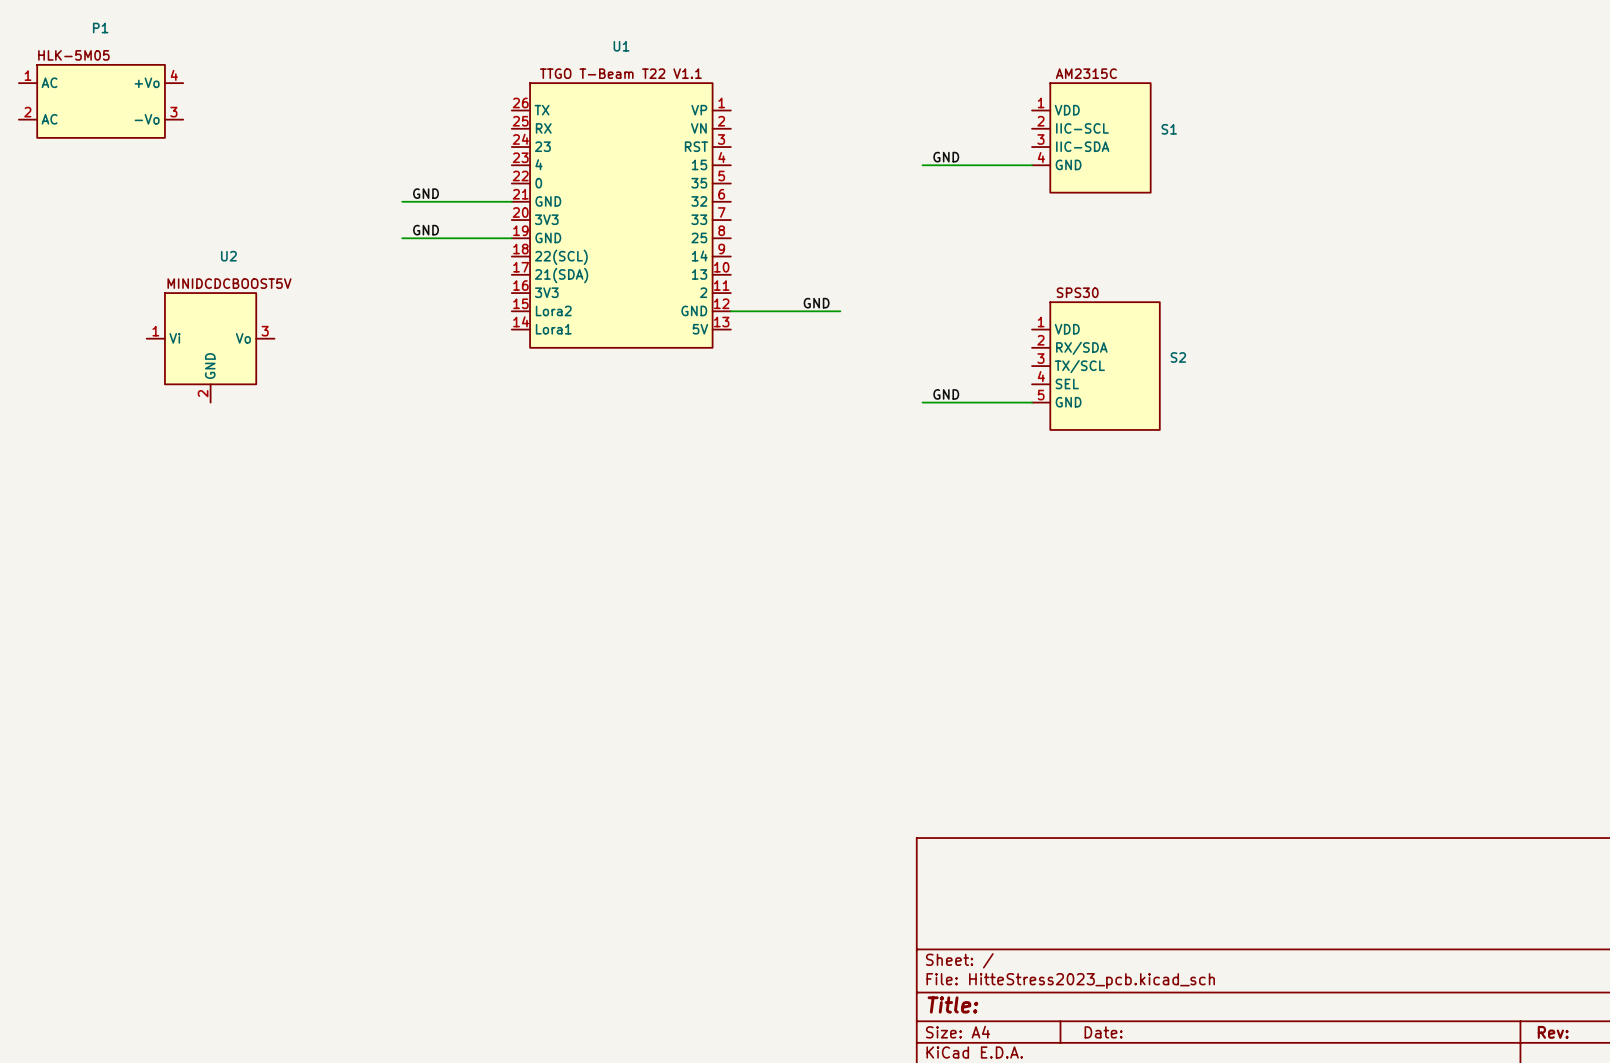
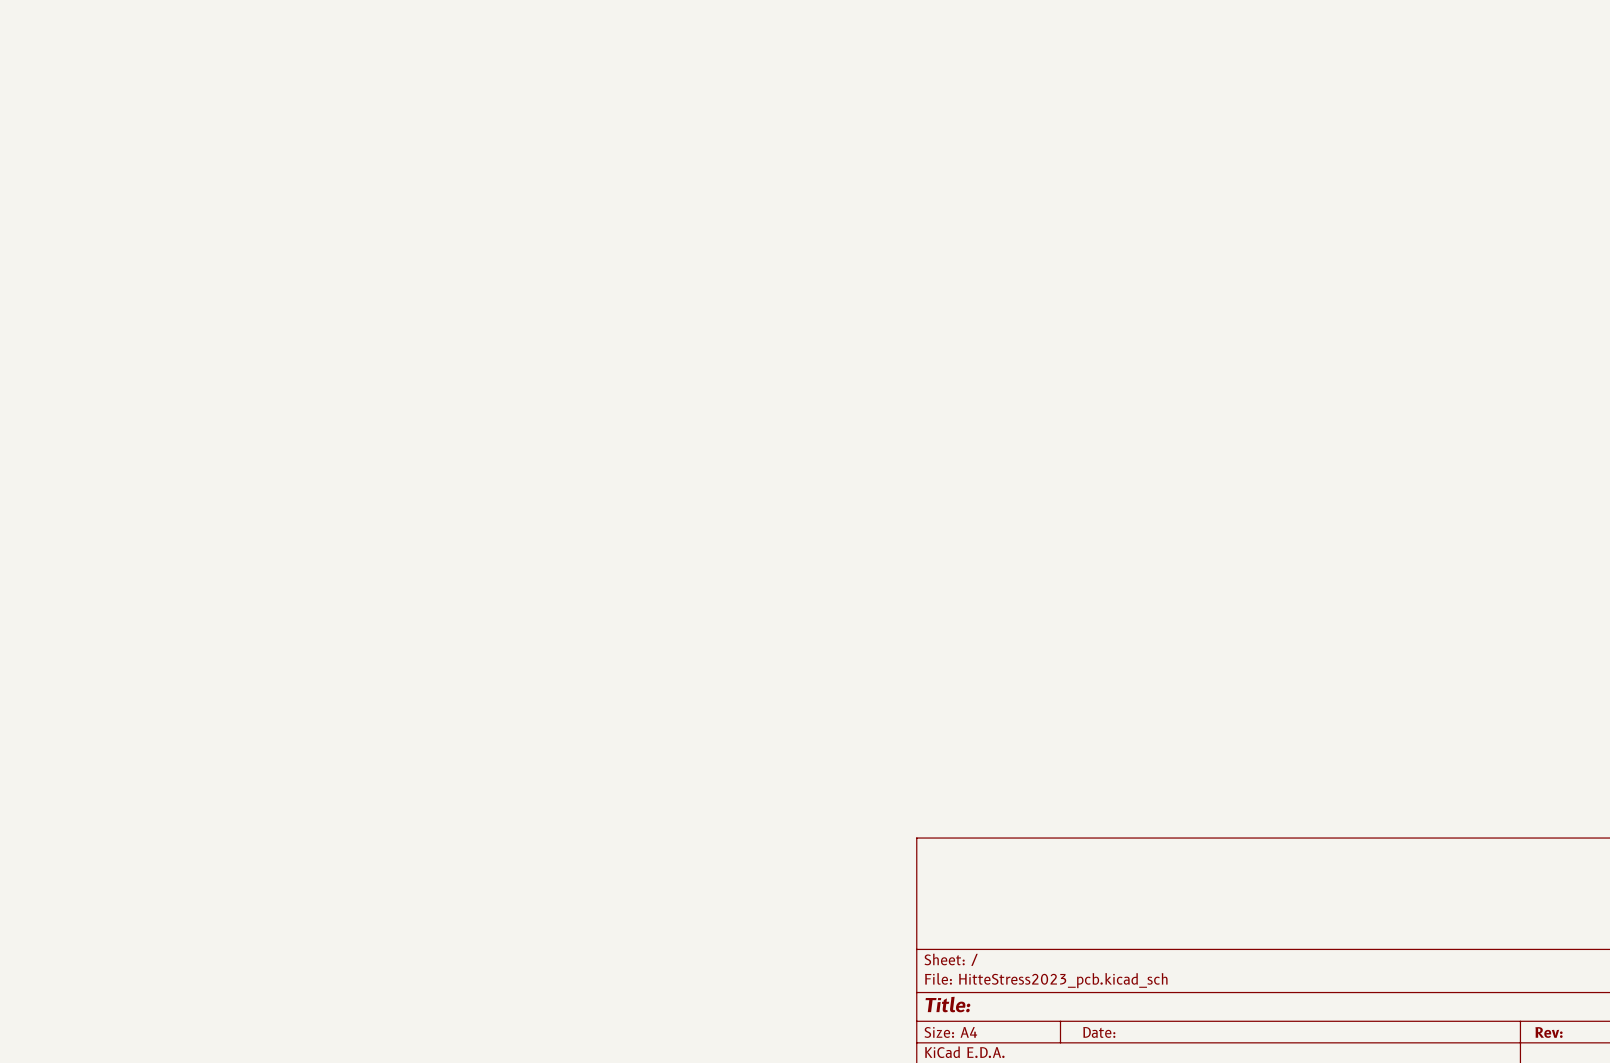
P1: (101, 101) -> none
S1: (1091, 137) -> none
label: GND (946, 157) -> none
wire: (922, 165) (1032, 165) -> none
label: GND (426, 193) -> none
wire: (402, 201) (511, 201) -> none
U1: (621, 215) -> none
label: GND (426, 230) -> none
wire: (402, 238) (511, 238) -> none
label: GND (816, 303) -> none
wire: (730, 311) (840, 311) -> none
U2: (210, 347) -> none
S2: (1095, 366) -> none
label: GND (946, 394) -> none
wire: (922, 402) (1032, 402) -> none

